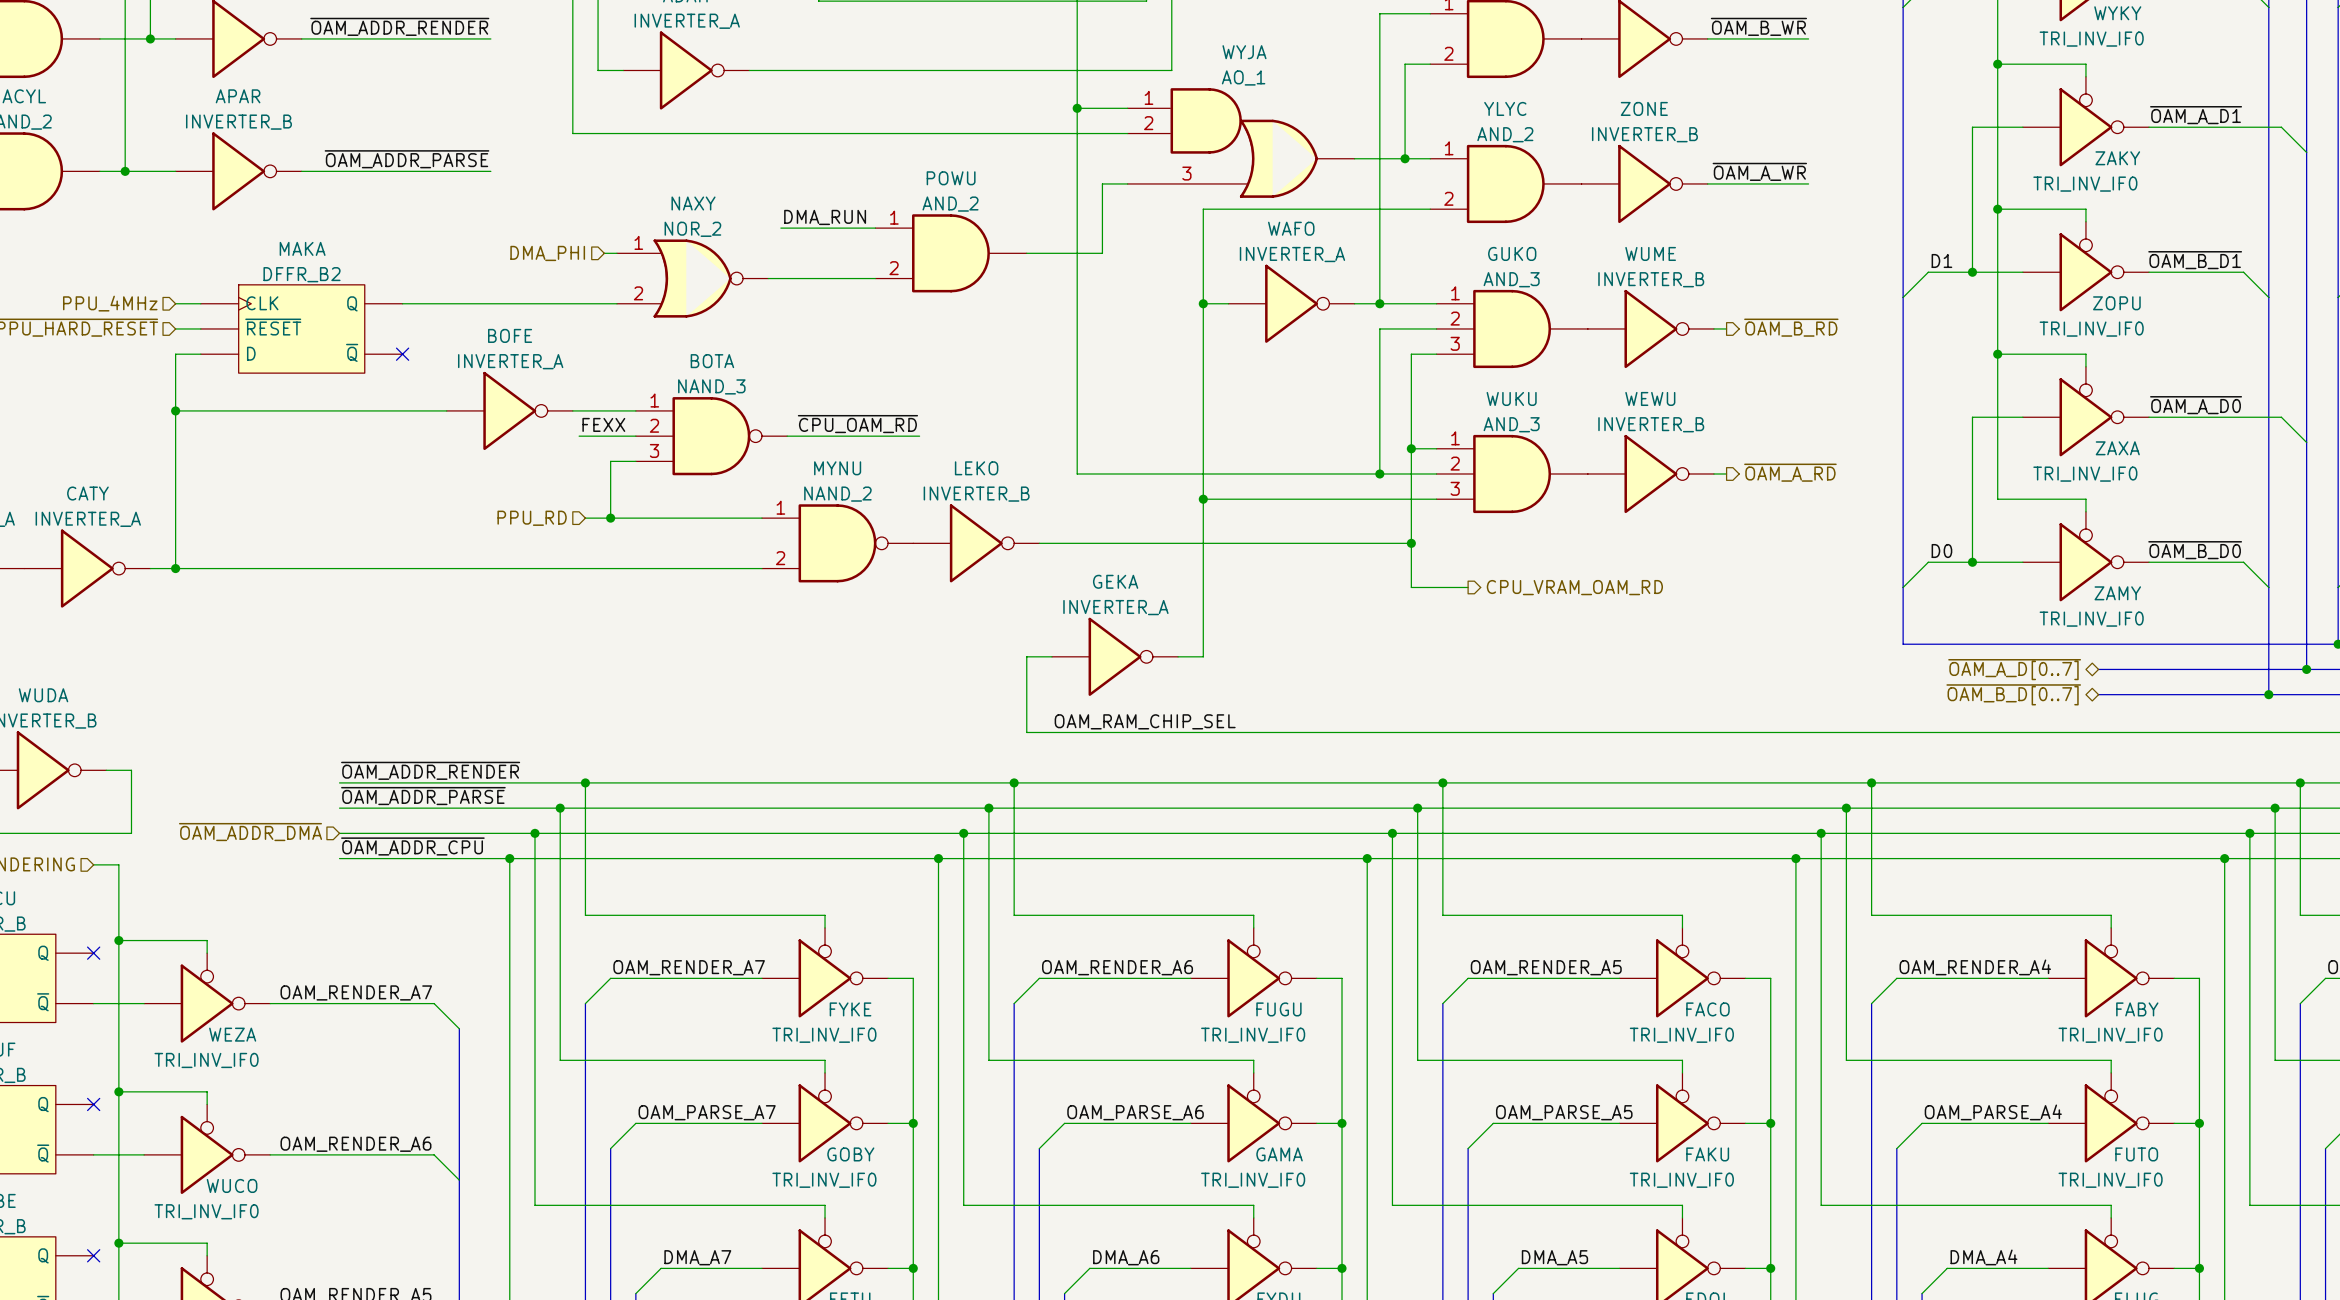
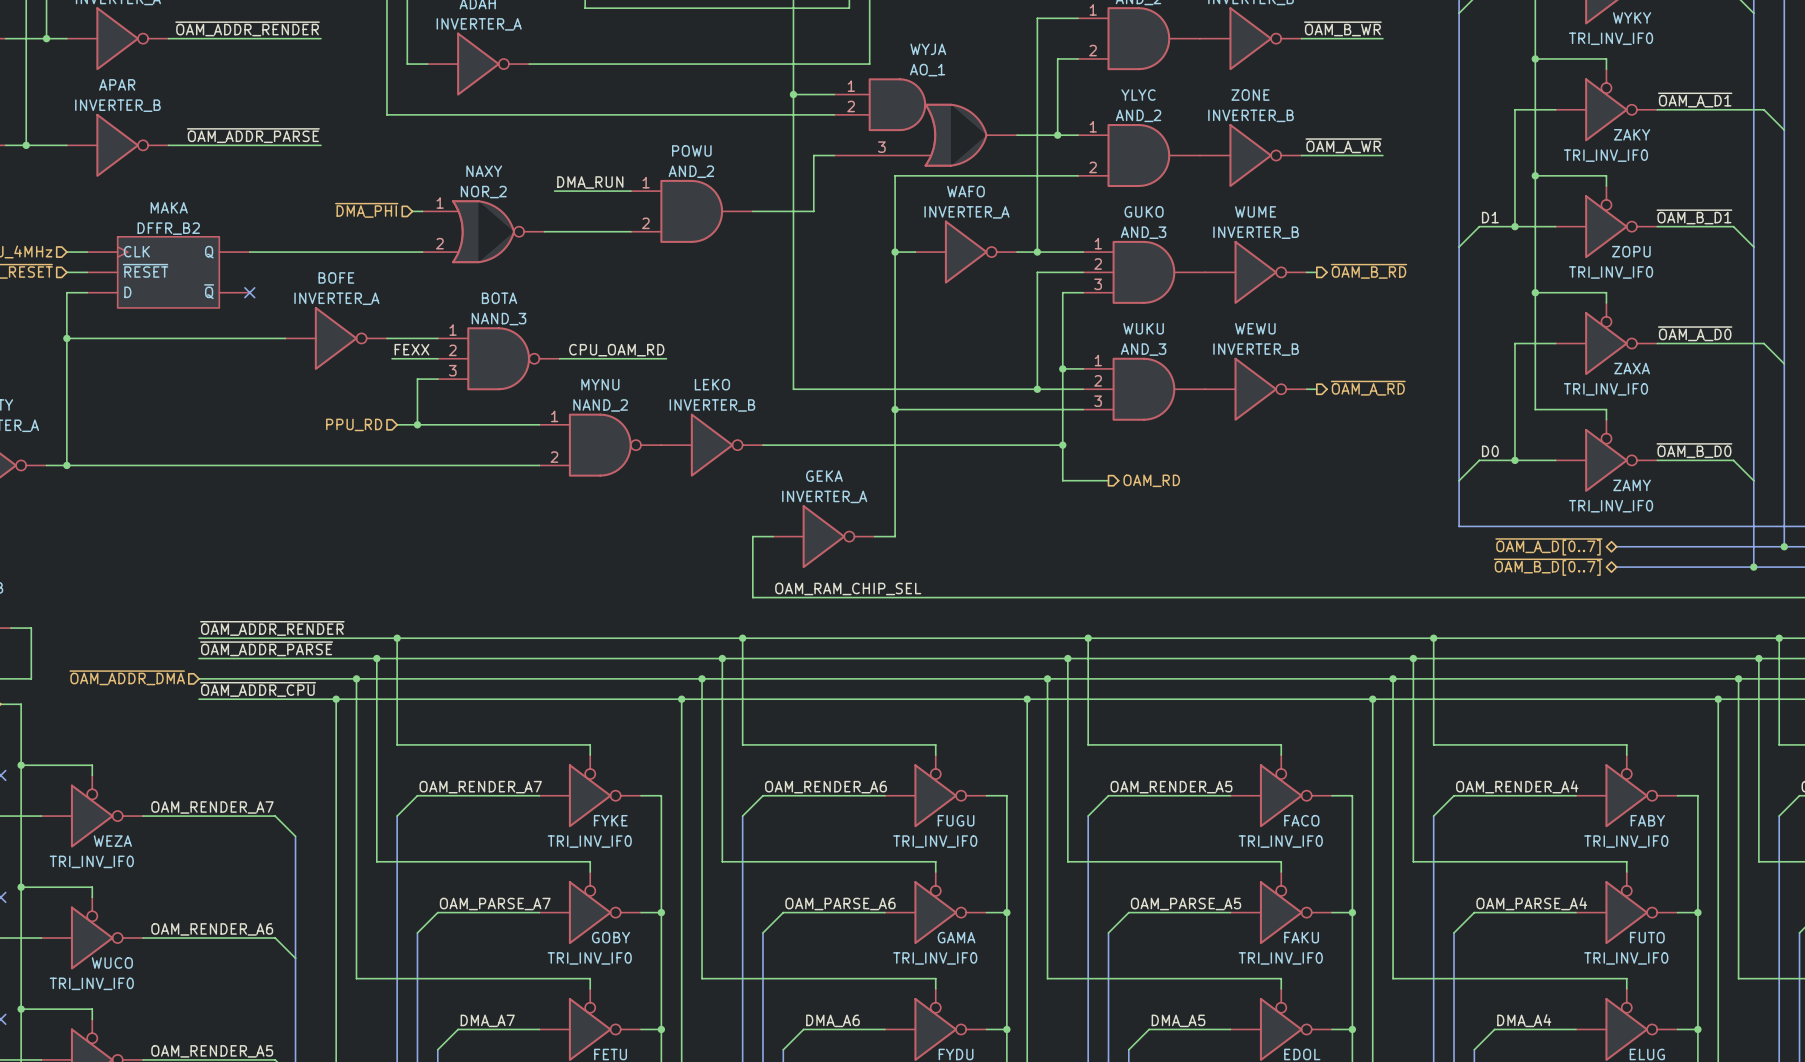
hierarchical label: DMA_PHI (547, 253) -> ~{DMA_PHI} (366, 210)
label: ~{CPU_OAM_RD} (857, 424) -> CPU_OAM_RD (616, 350)
hierarchical label: CPU_VRAM_OAM_RD (1574, 587) -> OAM_RD (1151, 480)

